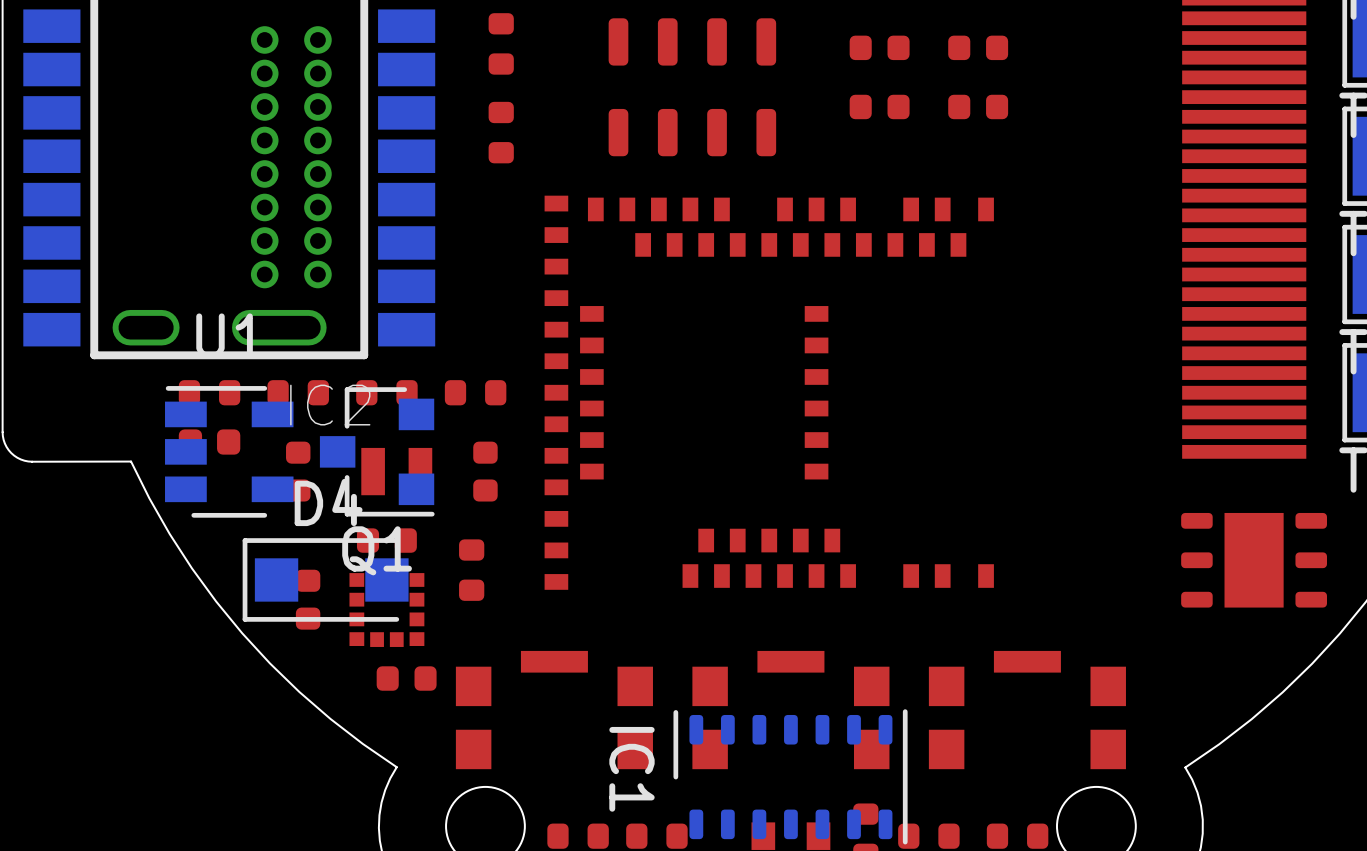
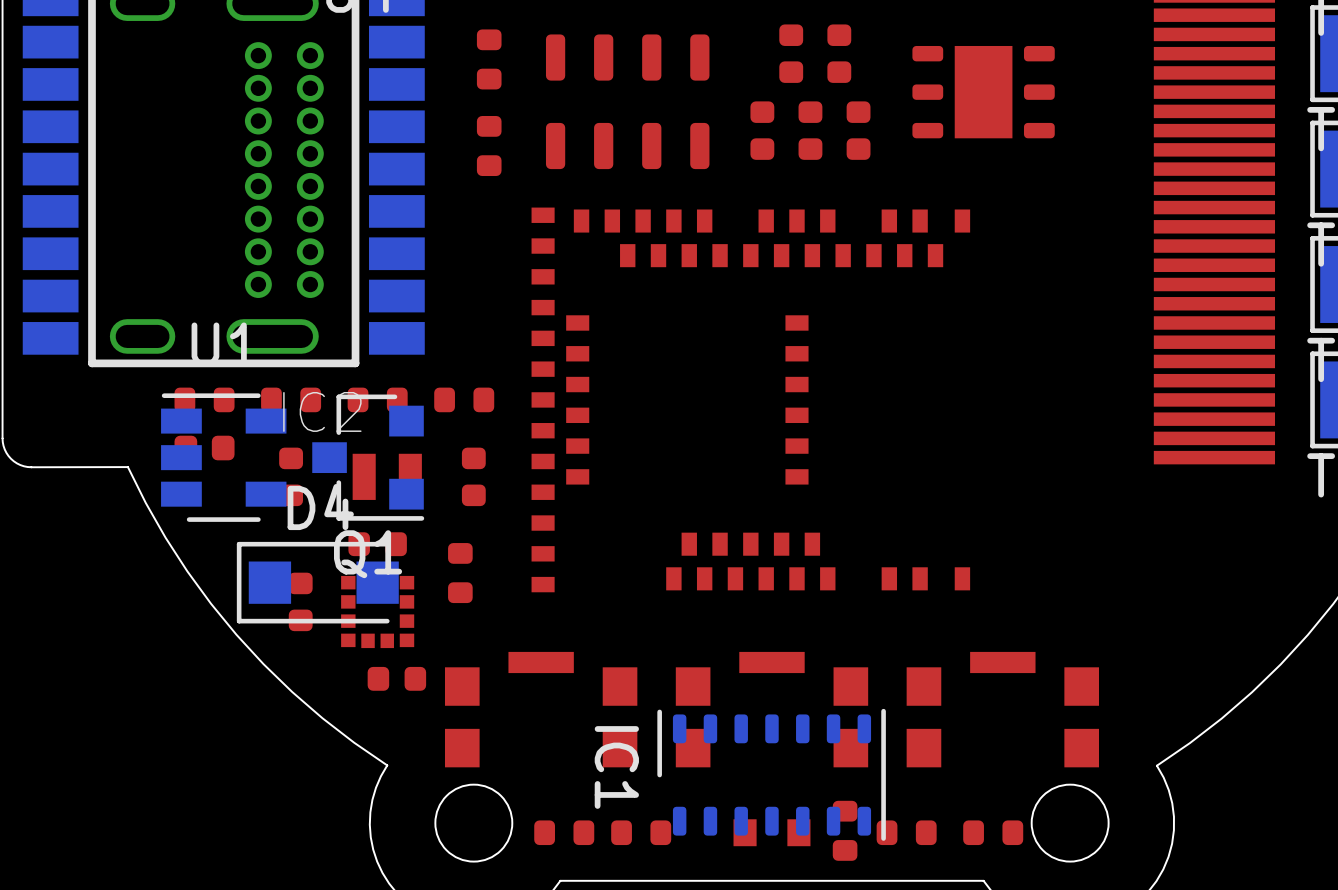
part: none -> (791, 53)
part rotation: 0° (879, 47) -> 90° clockwise (839, 53)
part: (978, 47) -> none
part position: (692, 87) -> (627, 101)
part rotation: 0° (879, 106) -> 90° clockwise (858, 130)
part: (978, 106) -> none
part: none -> (762, 130)
part: none -> (810, 130)
part position: (1254, 560) -> (983, 92)

